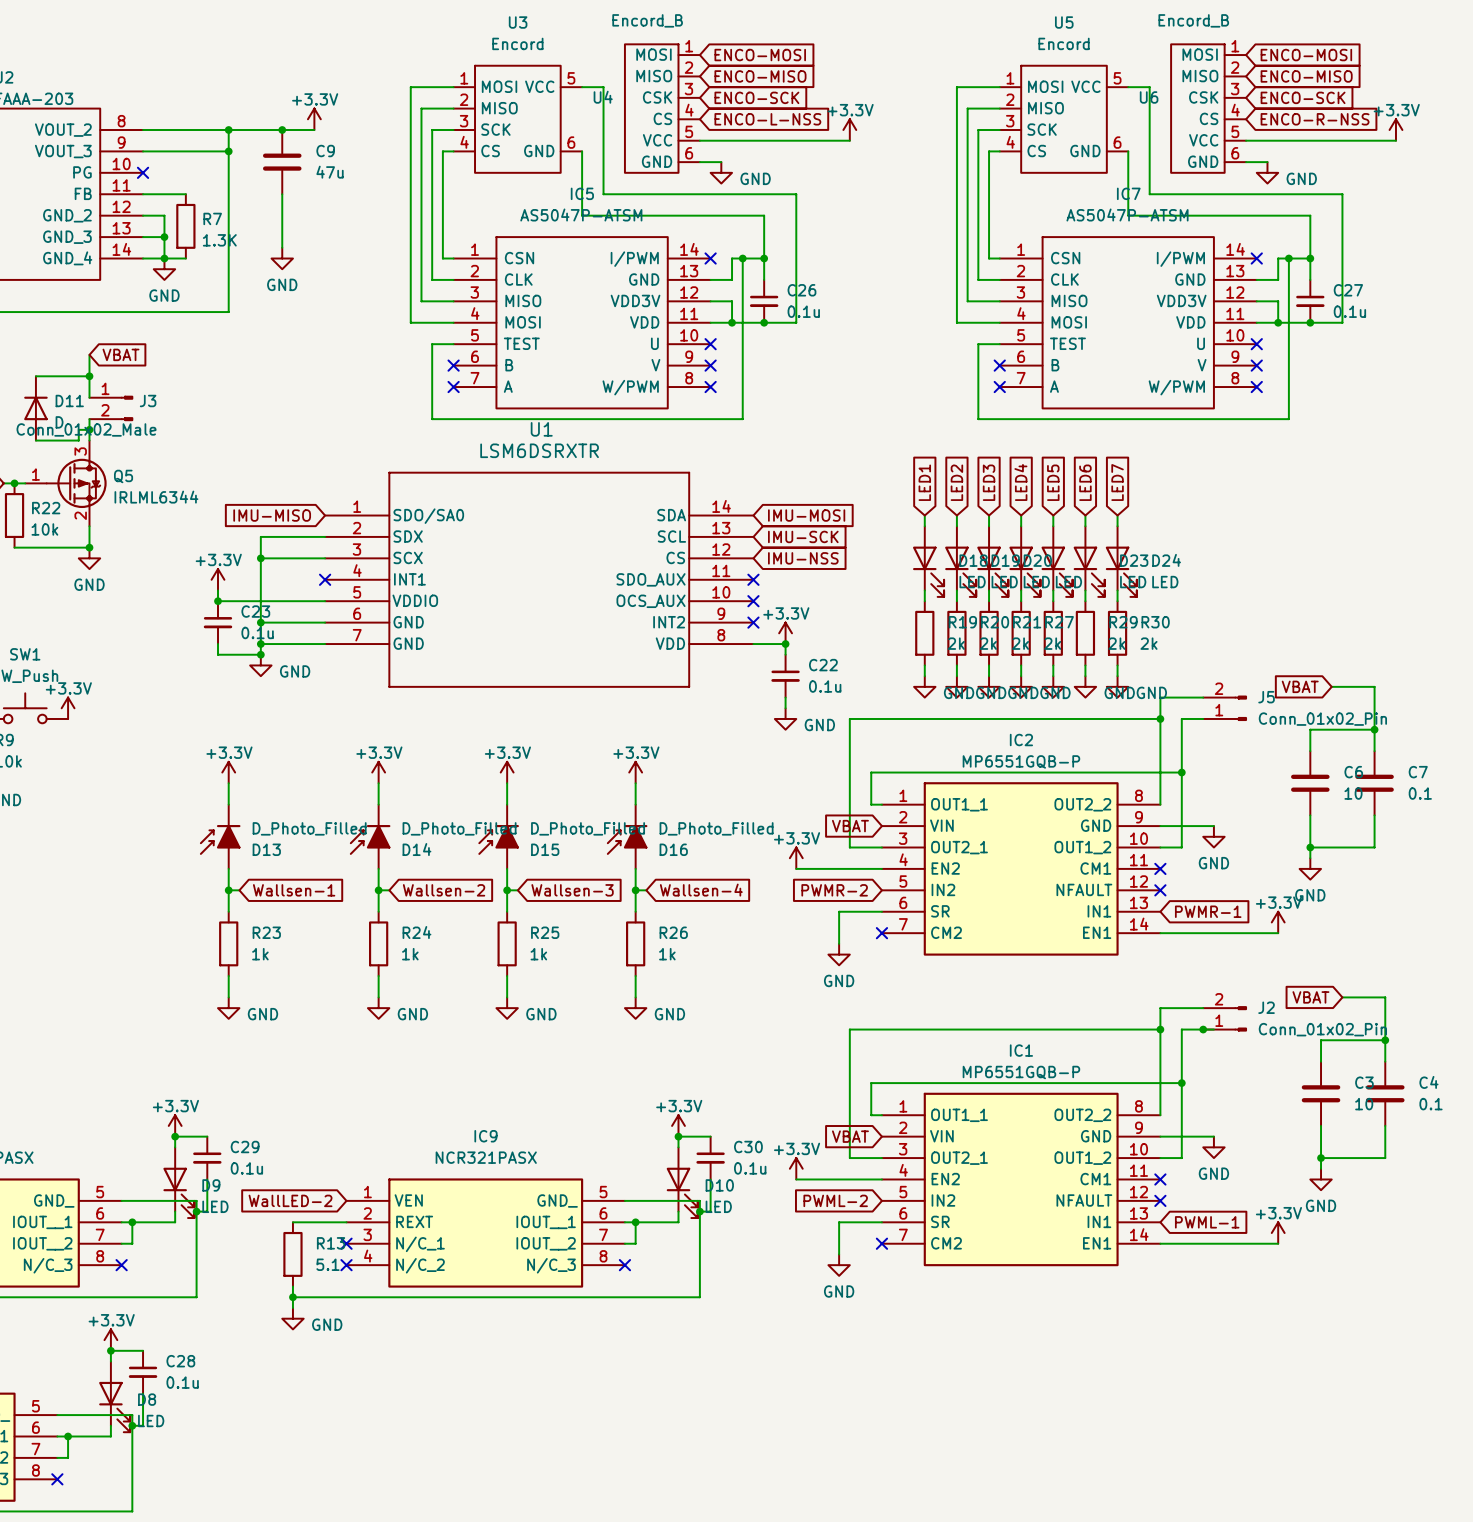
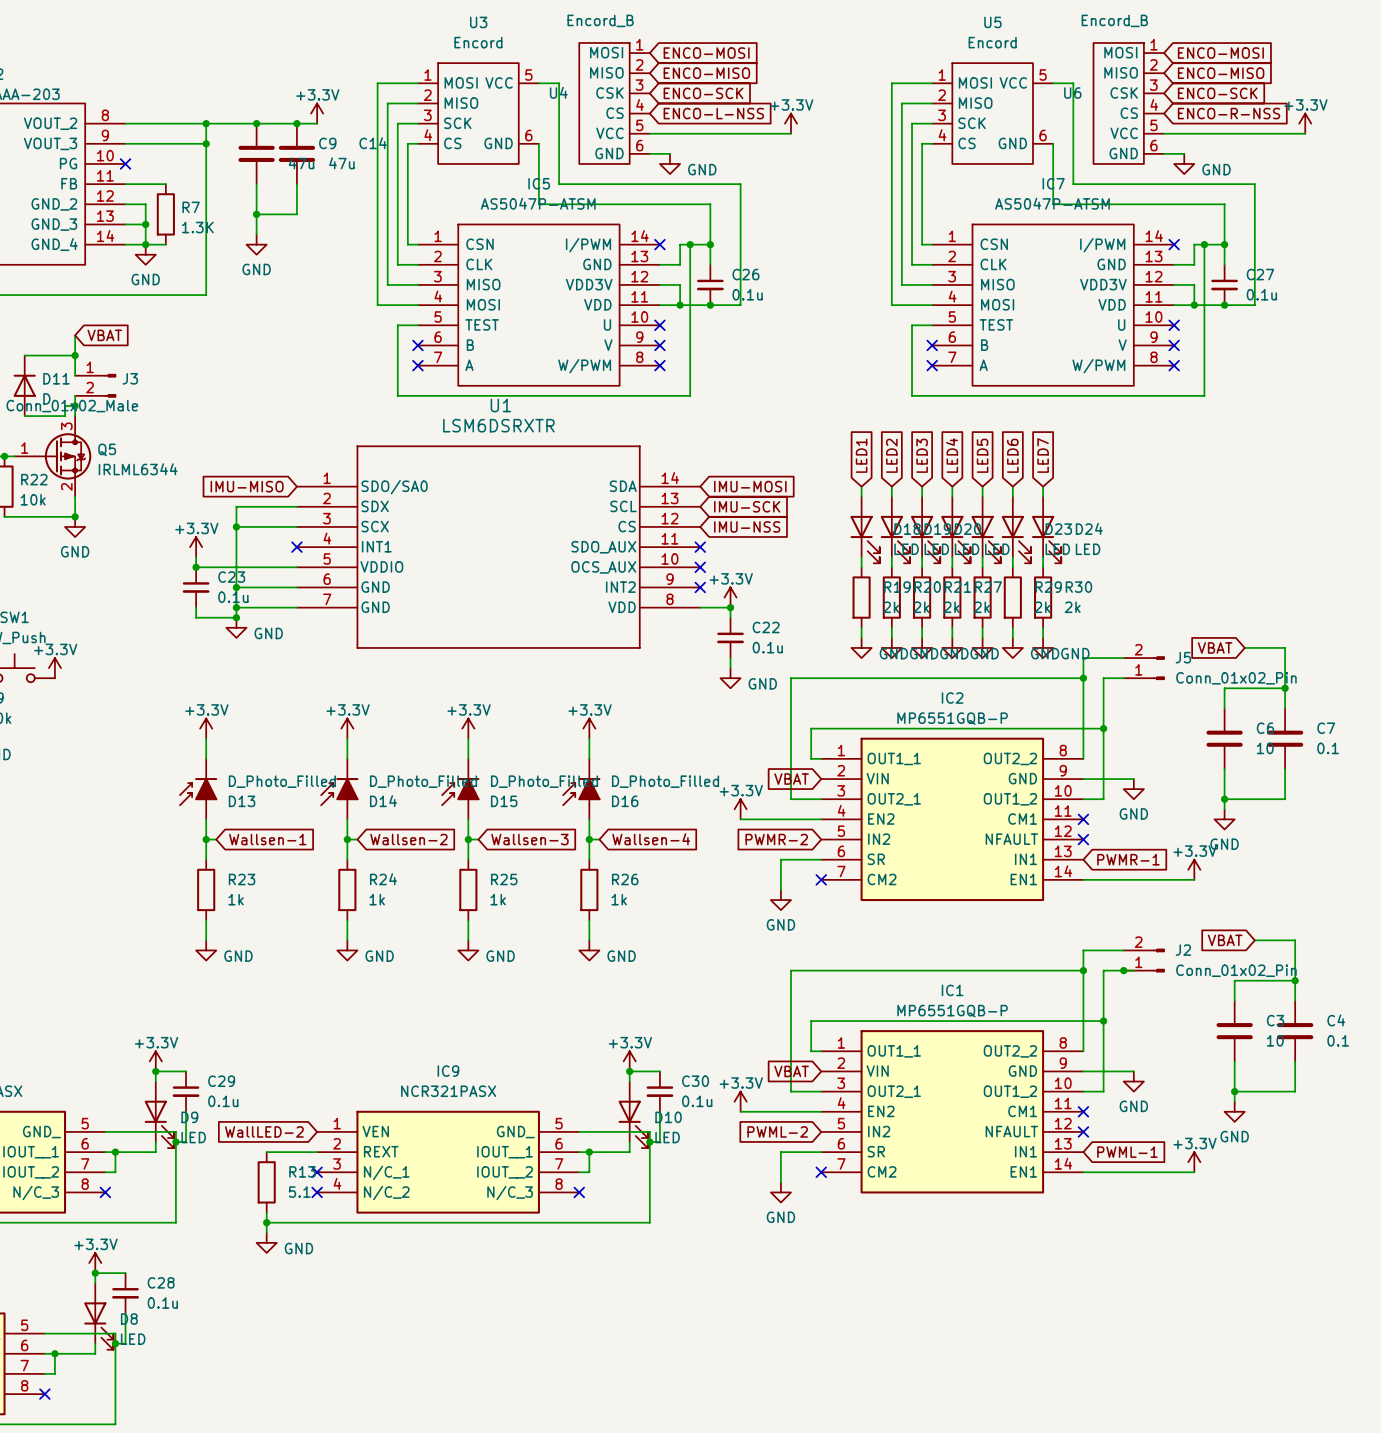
power symbol position: +3.3V (314, 119) -> +3.3V (317, 113)
wire: none -> (286, 123) (317, 123)
junction: none -> (296, 123)
C9 name position: C9 (325, 151) -> C9 (327, 143)
C14: none -> 47u (296, 153)
wire: none -> (296, 184) (296, 214) (256, 214)
junction: none -> (256, 214)

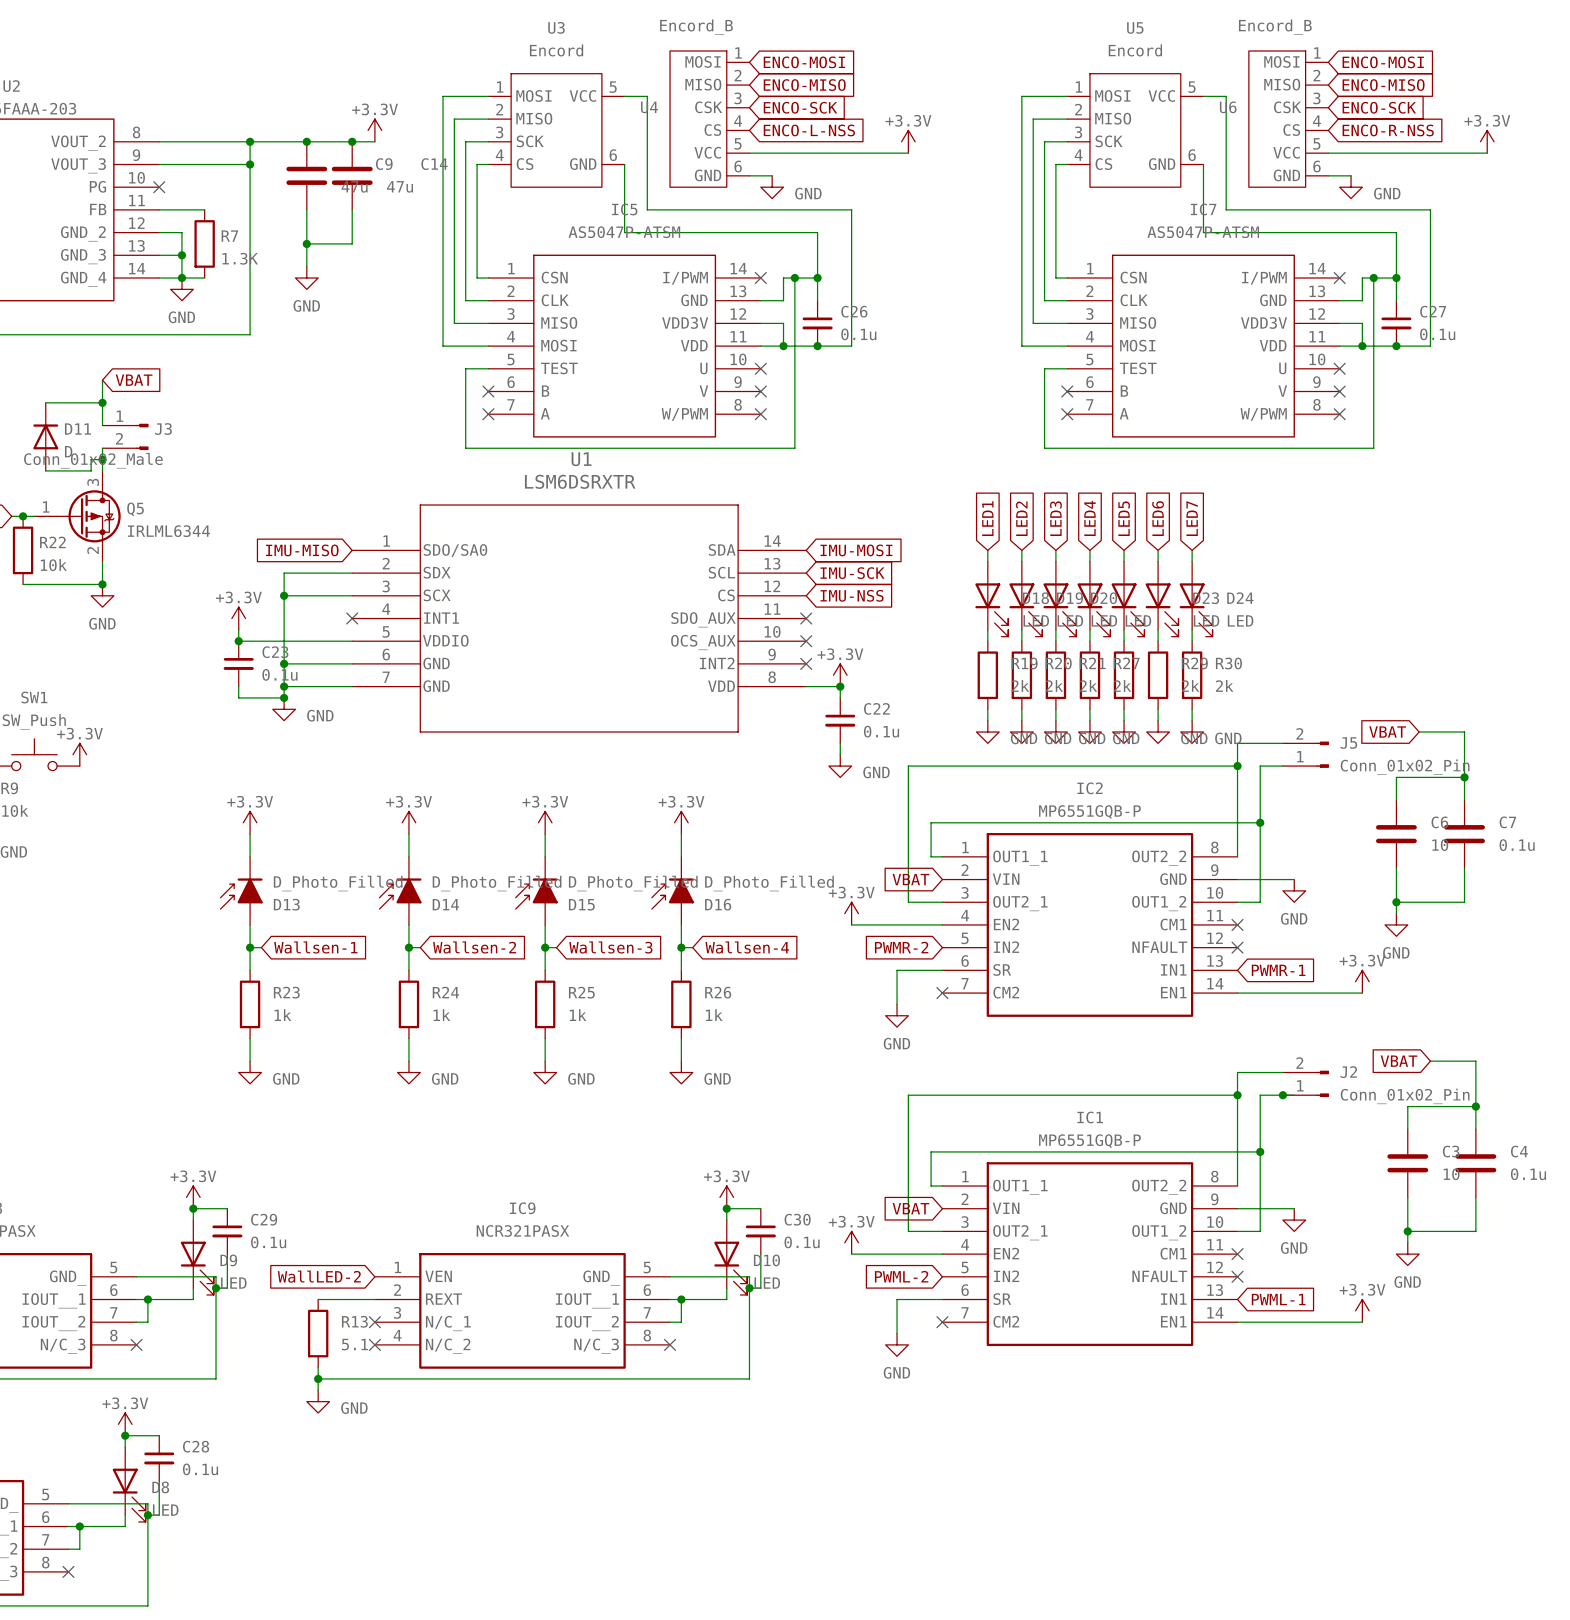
C7 value: 0.1 (1328, 748) -> 0.1u (1517, 845)
C4 value: 0.1 (1338, 1040) -> 0.1u (1528, 1174)

